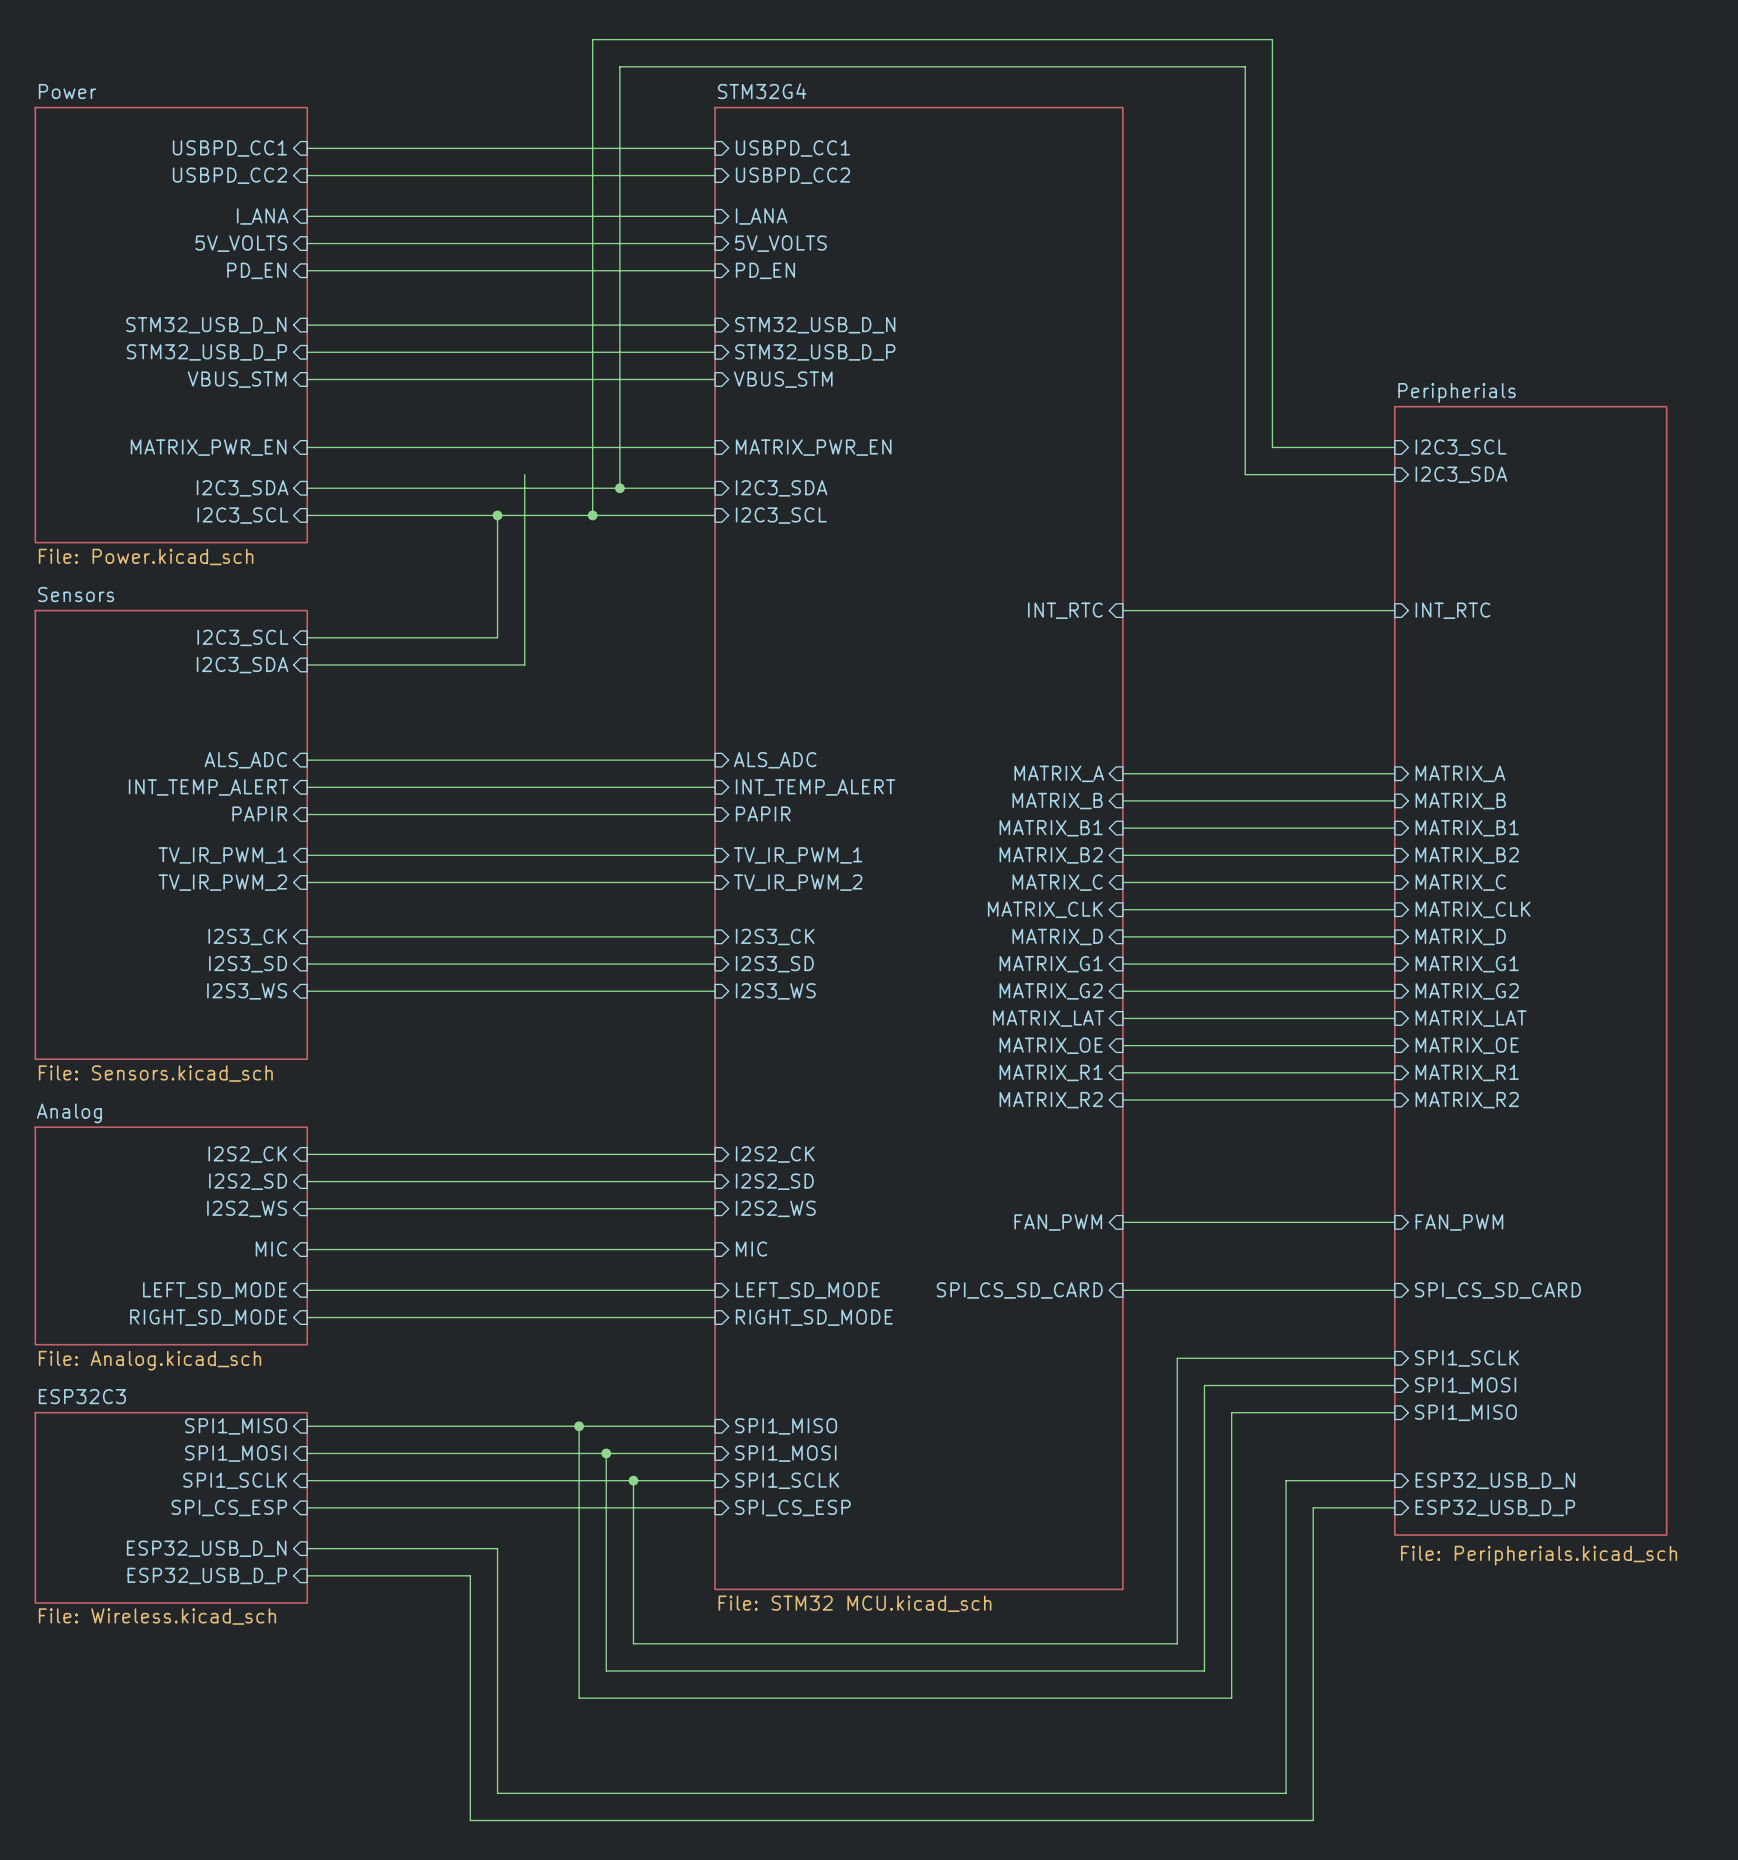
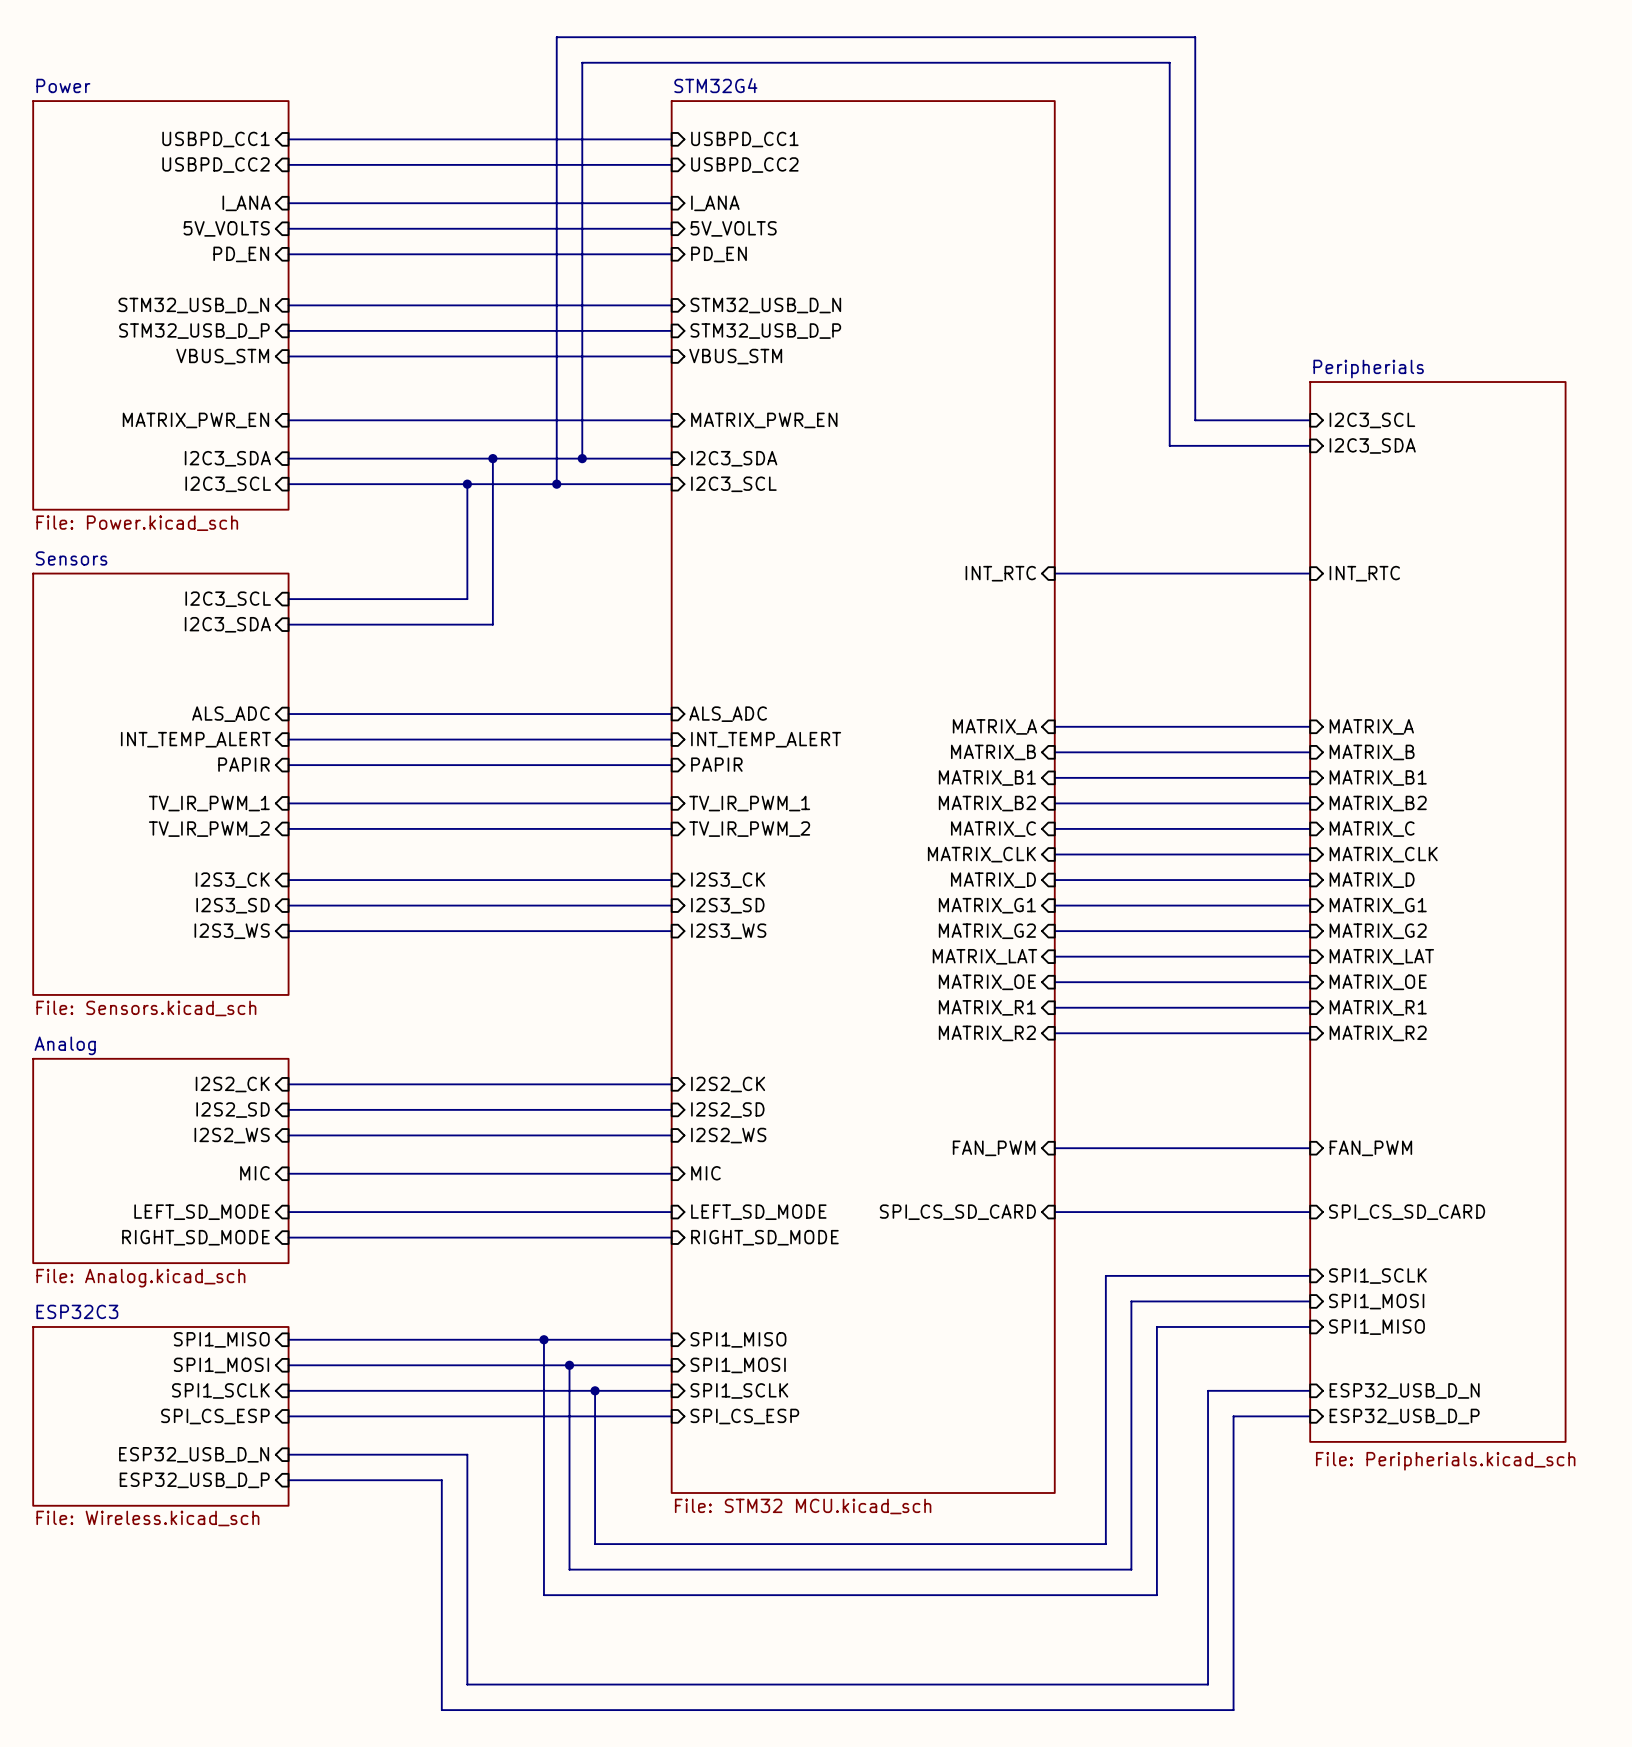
wire: (524, 474) (524, 488) -> none
junction: none -> (492, 458)

